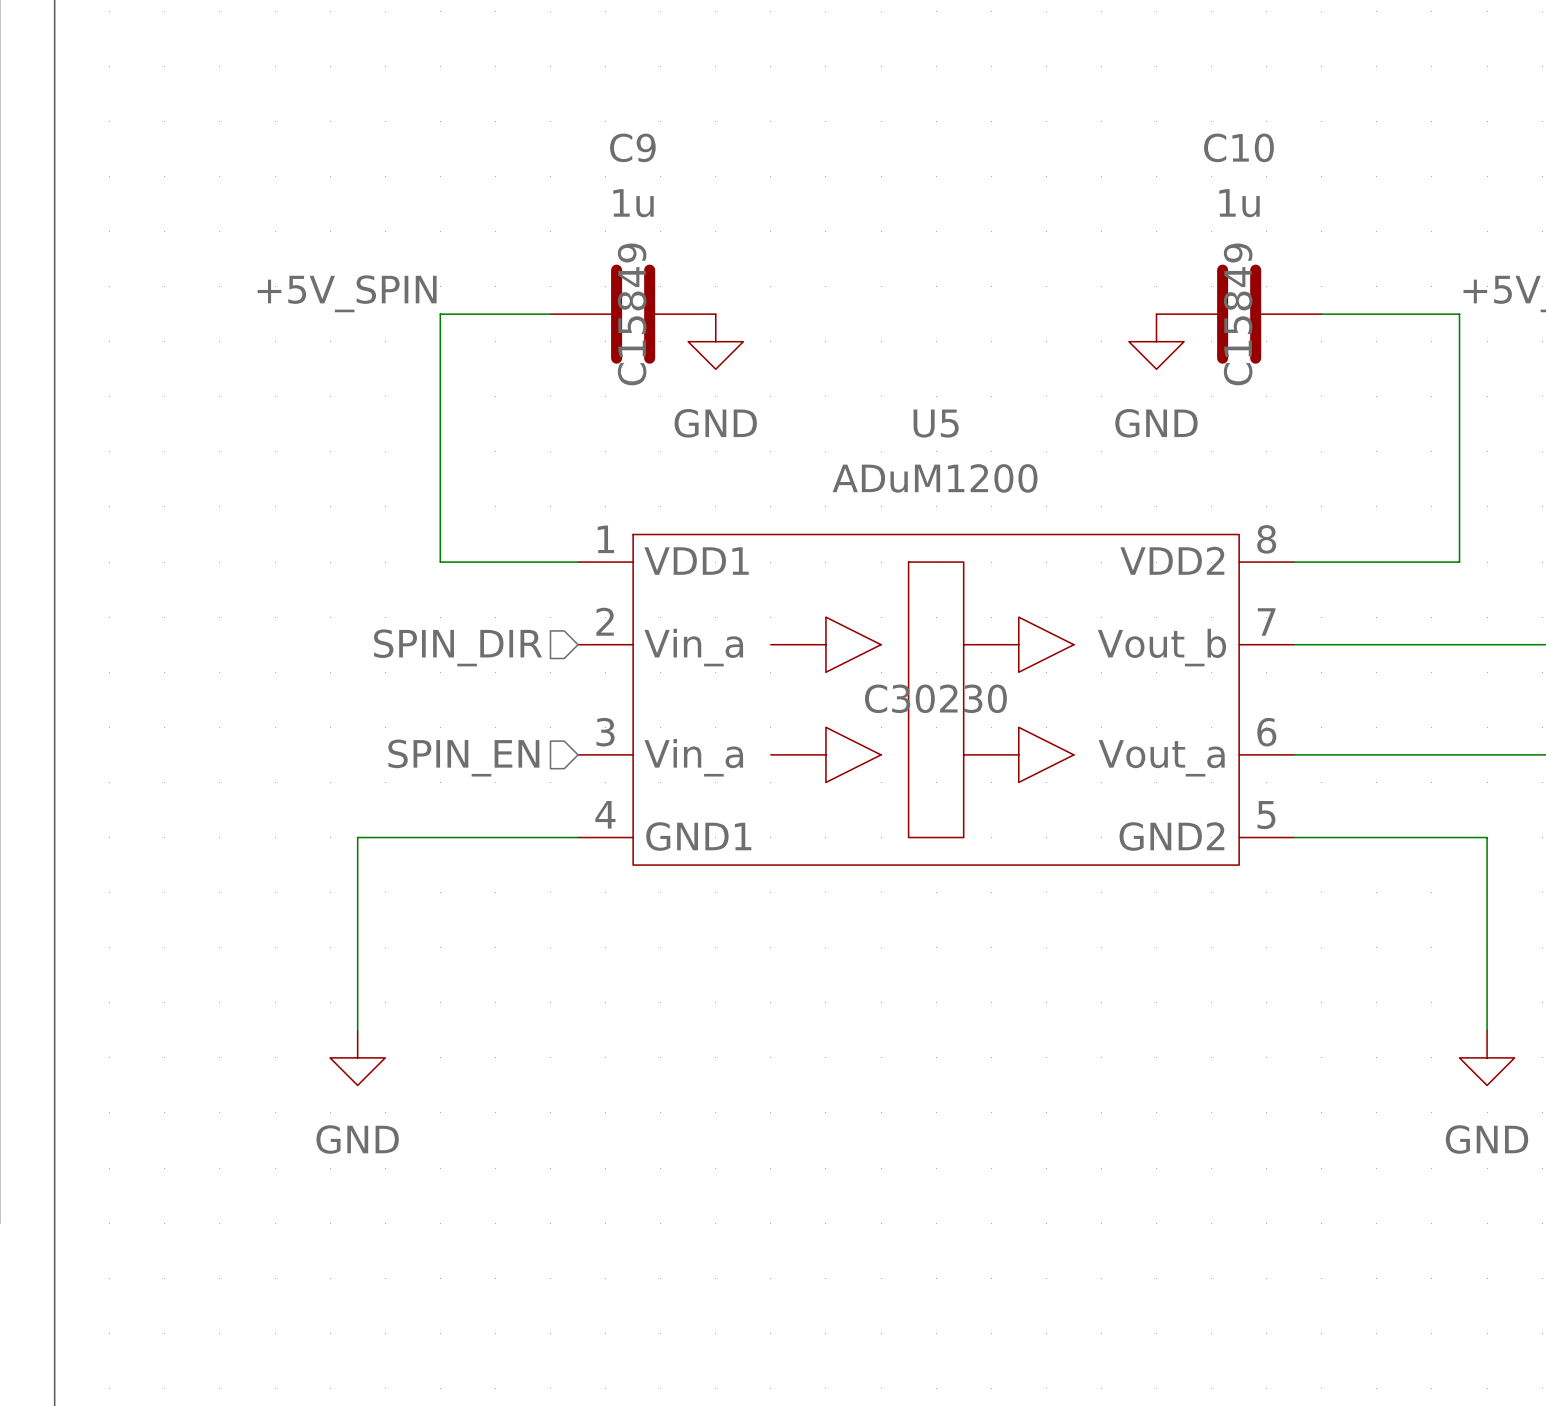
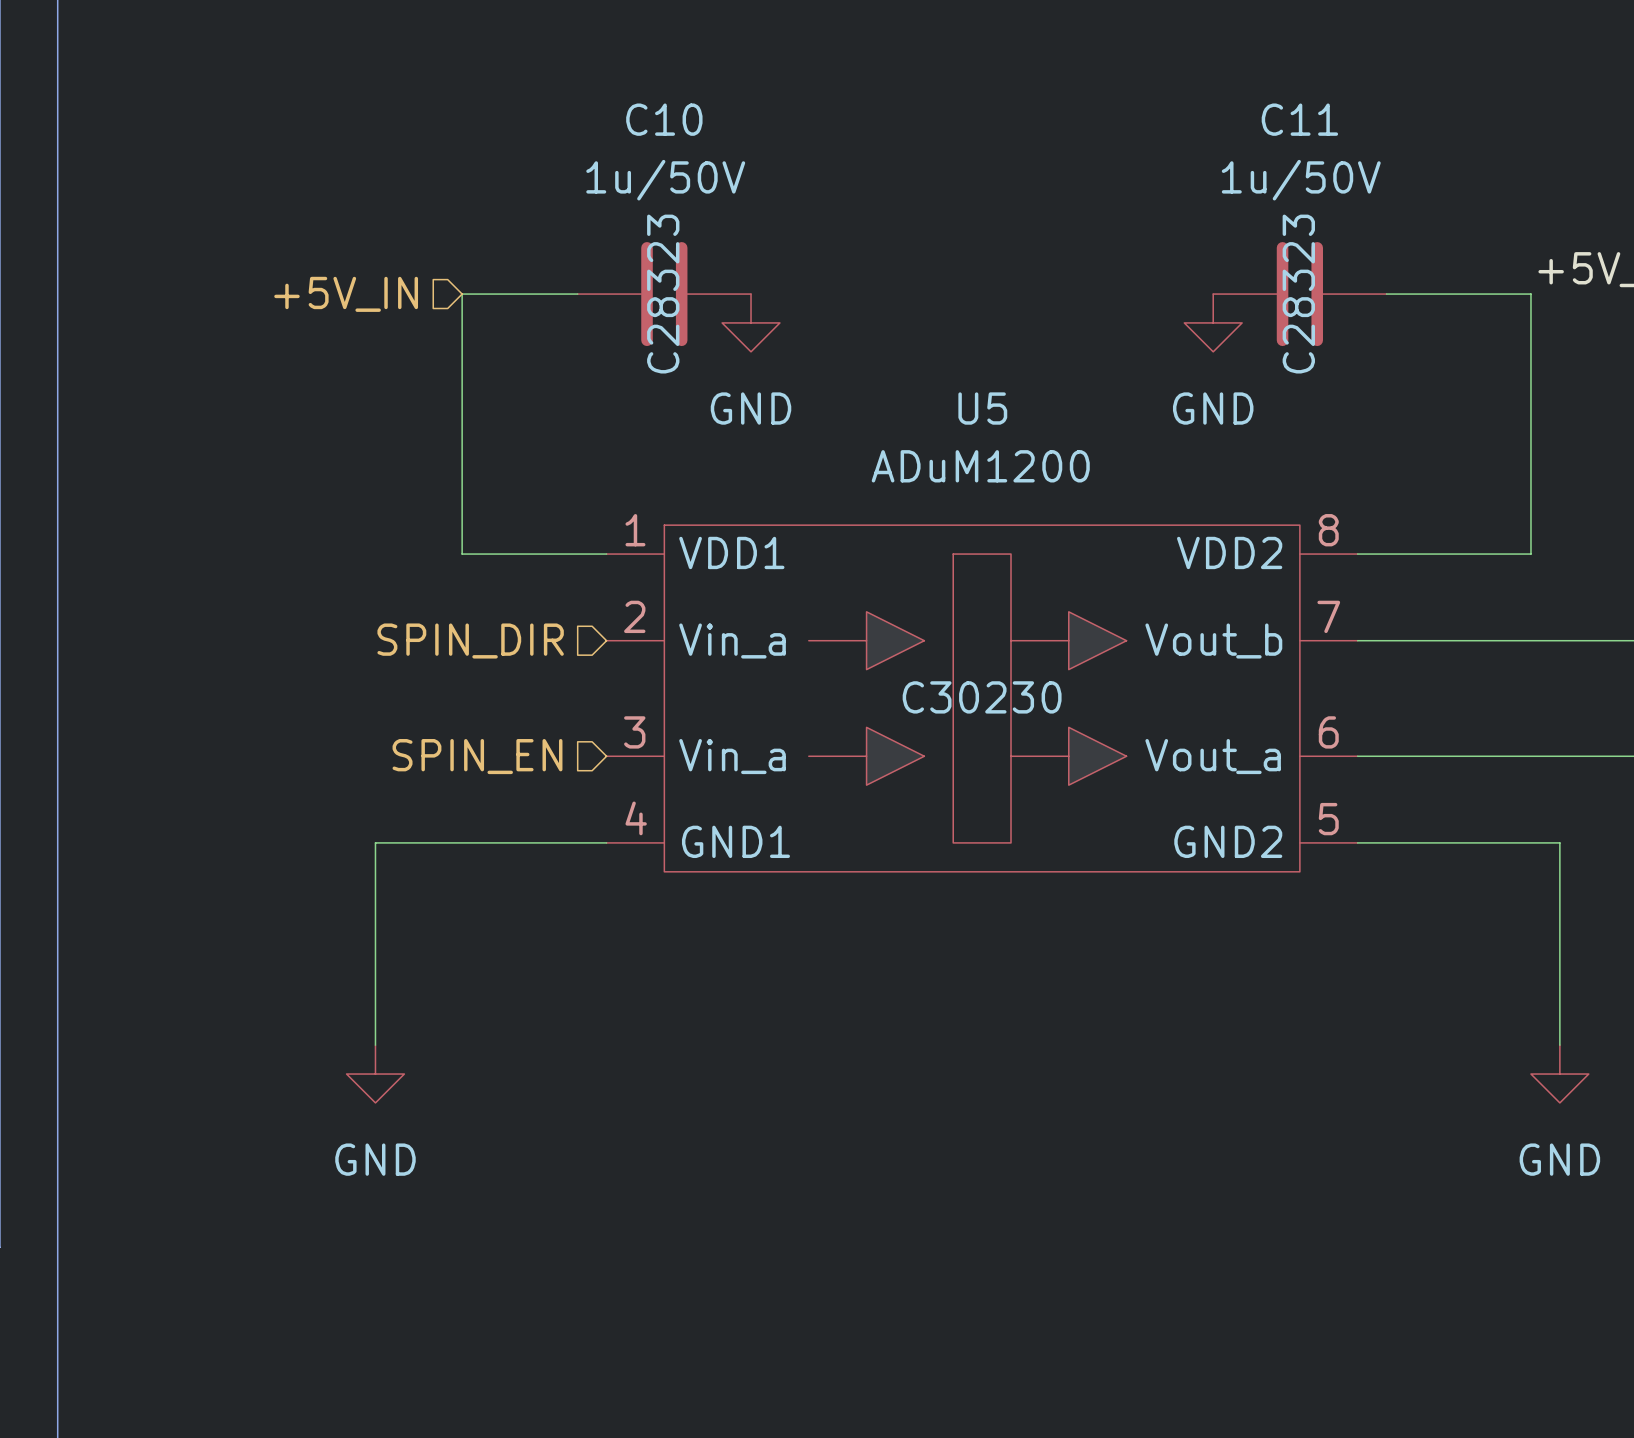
C9 name: C9 (632, 147) -> C10 (664, 119)
C10 name: C10 (1238, 147) -> C11 (1299, 119)
C9 value: 1u (633, 203) -> 1u/50V (665, 180)
C10 value: 1u (1239, 203) -> 1u/50V (1301, 180)
label: +5V_SPIN (347, 293) -> none
C9 text: C15849 (632, 314) -> C28323 (663, 294)
C10 text: C15849 (1238, 314) -> C28323 (1298, 294)
hierarchical label: none -> +5V_IN (346, 294)

